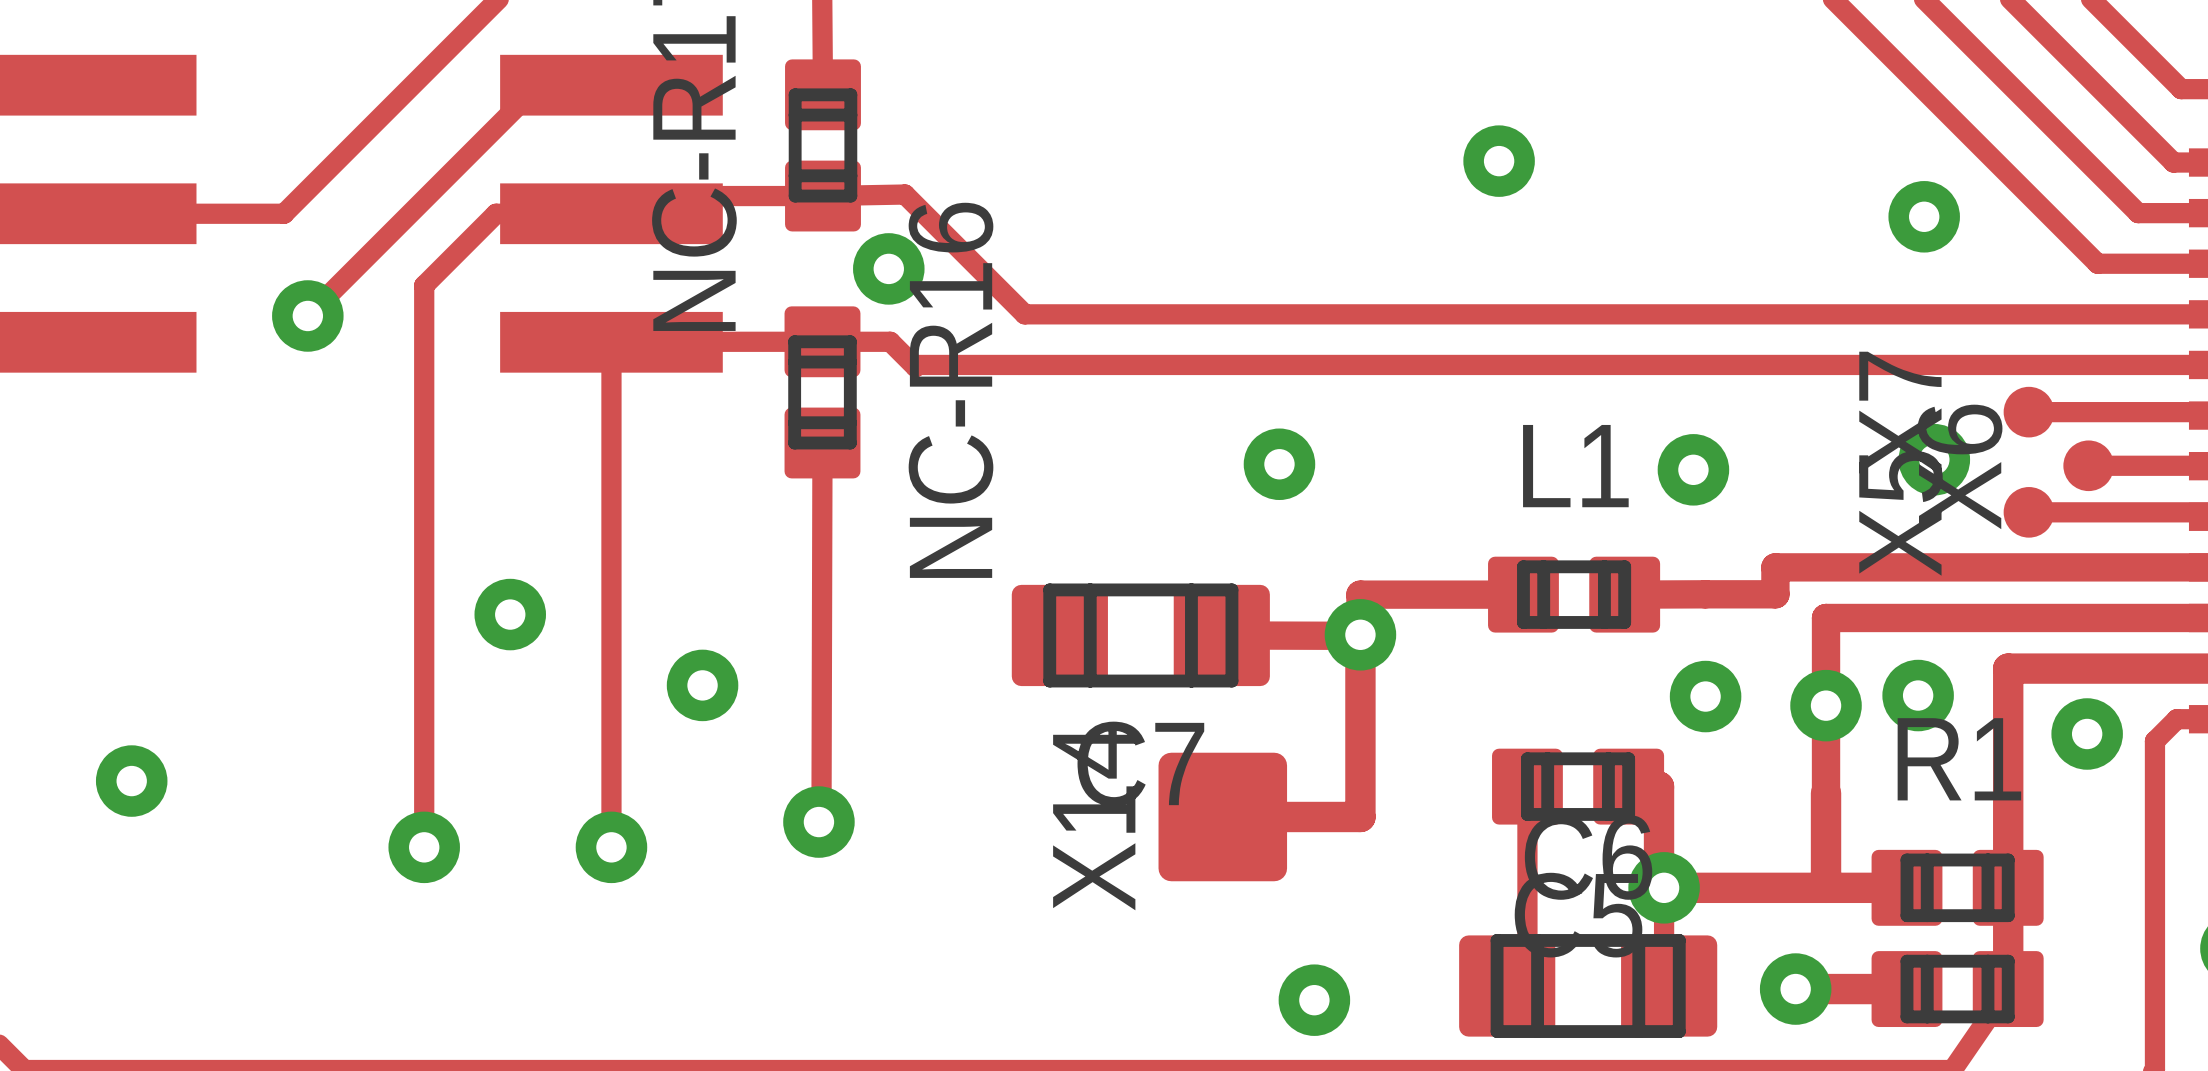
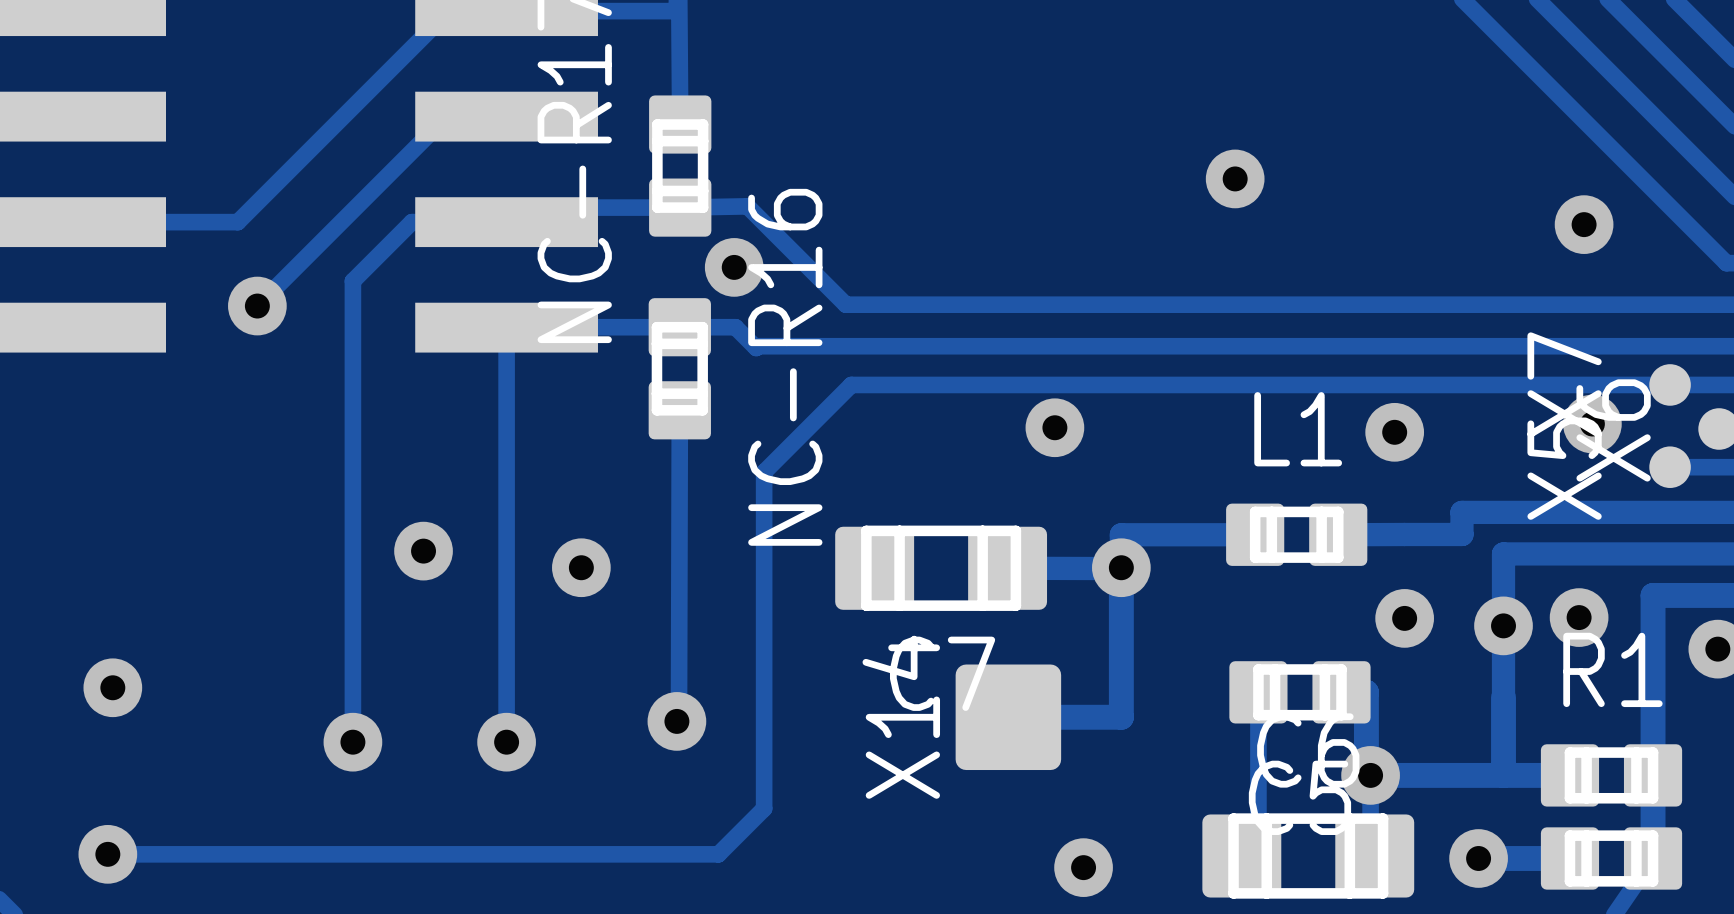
track: none -> (1670, 384) (851, 384) (764, 472) (764, 808) (718, 854) (107, 854)
via position: (702, 685) -> (581, 567)
via: none -> (107, 854)

